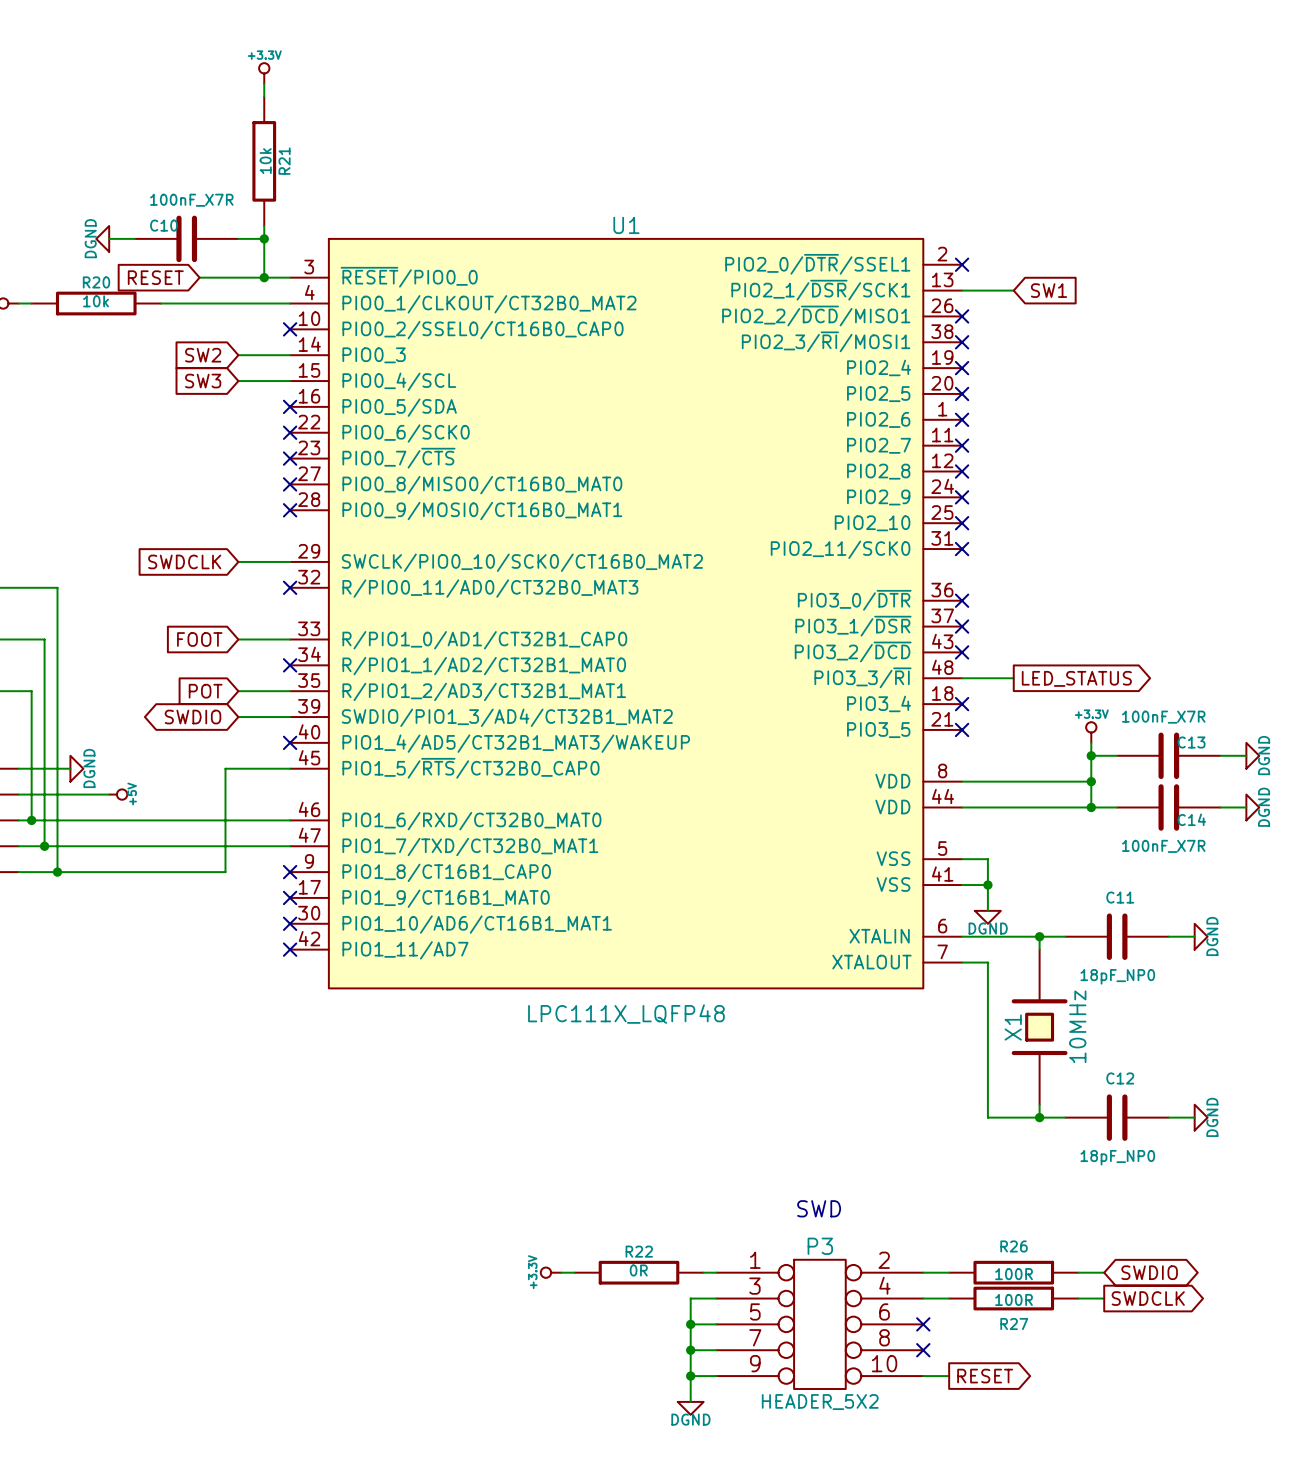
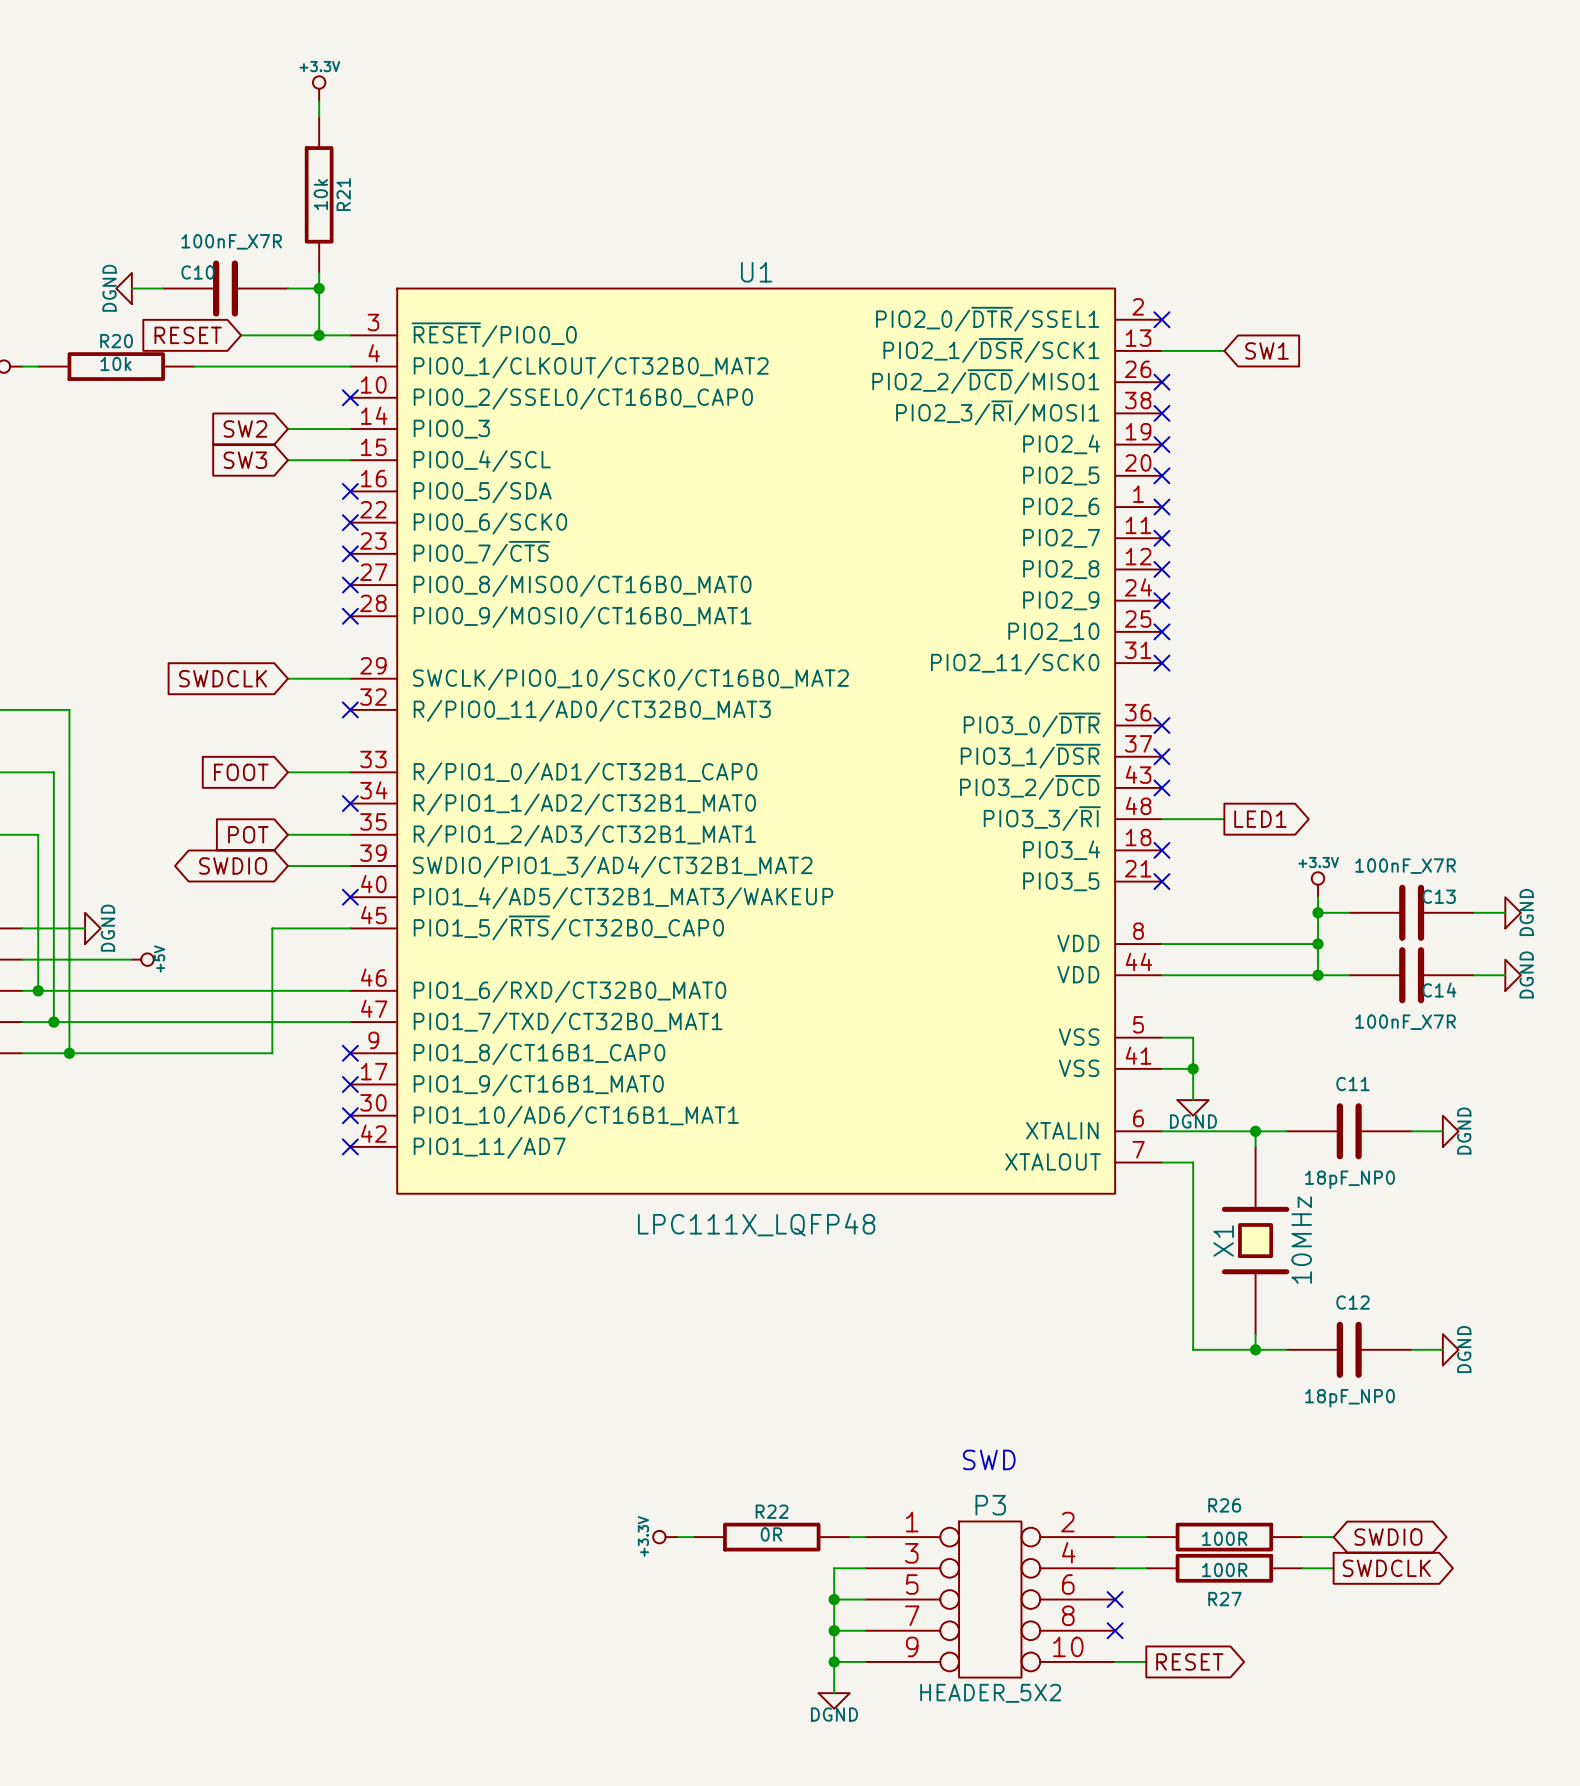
global label: LED_STATUS (1076, 678) -> LED1 (1260, 819)

